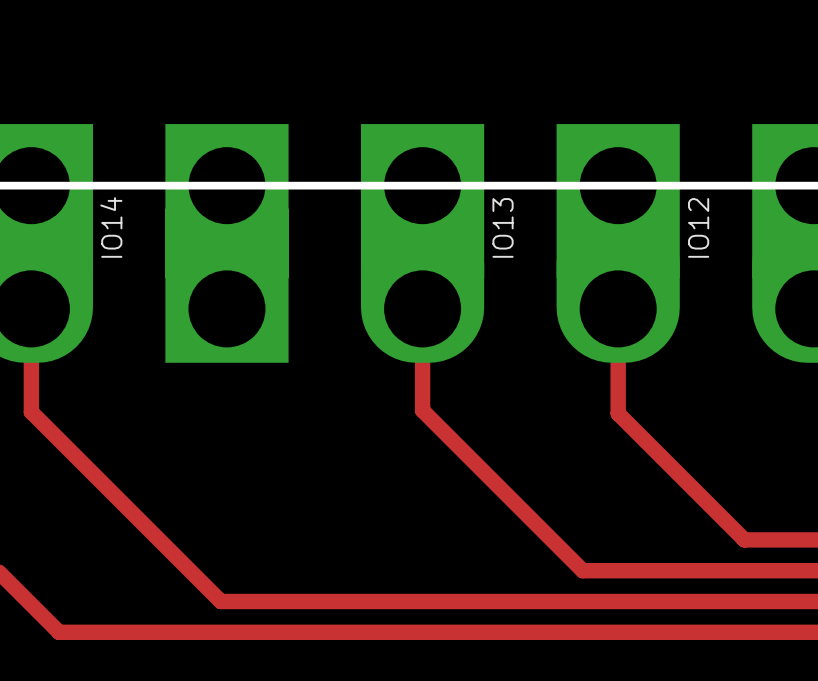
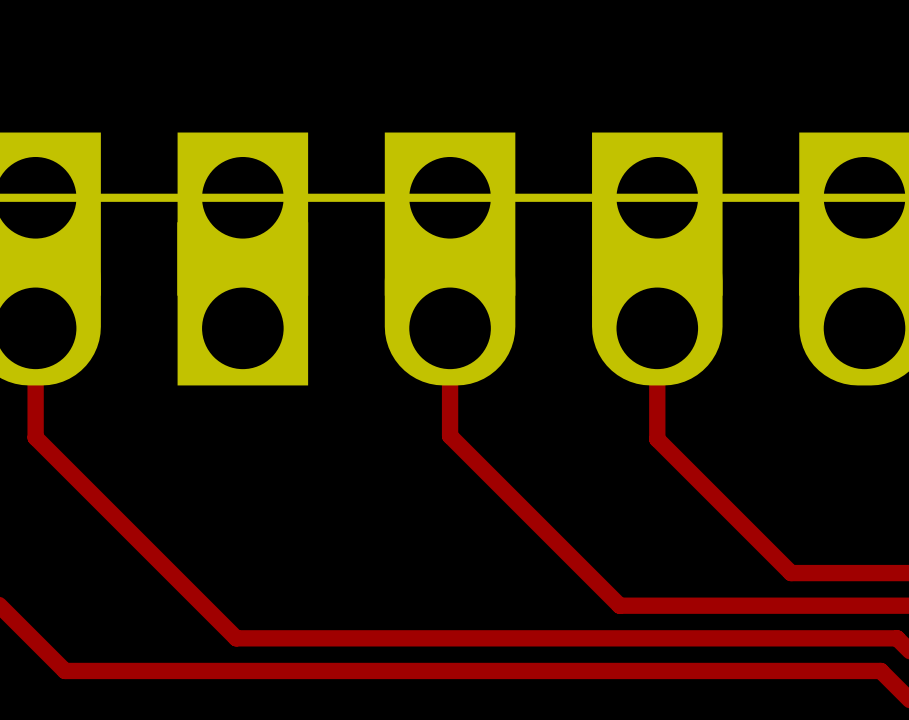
text: IO14 (111, 227) -> none
text: IO13 (503, 227) -> none
text: IO12 (698, 227) -> none

